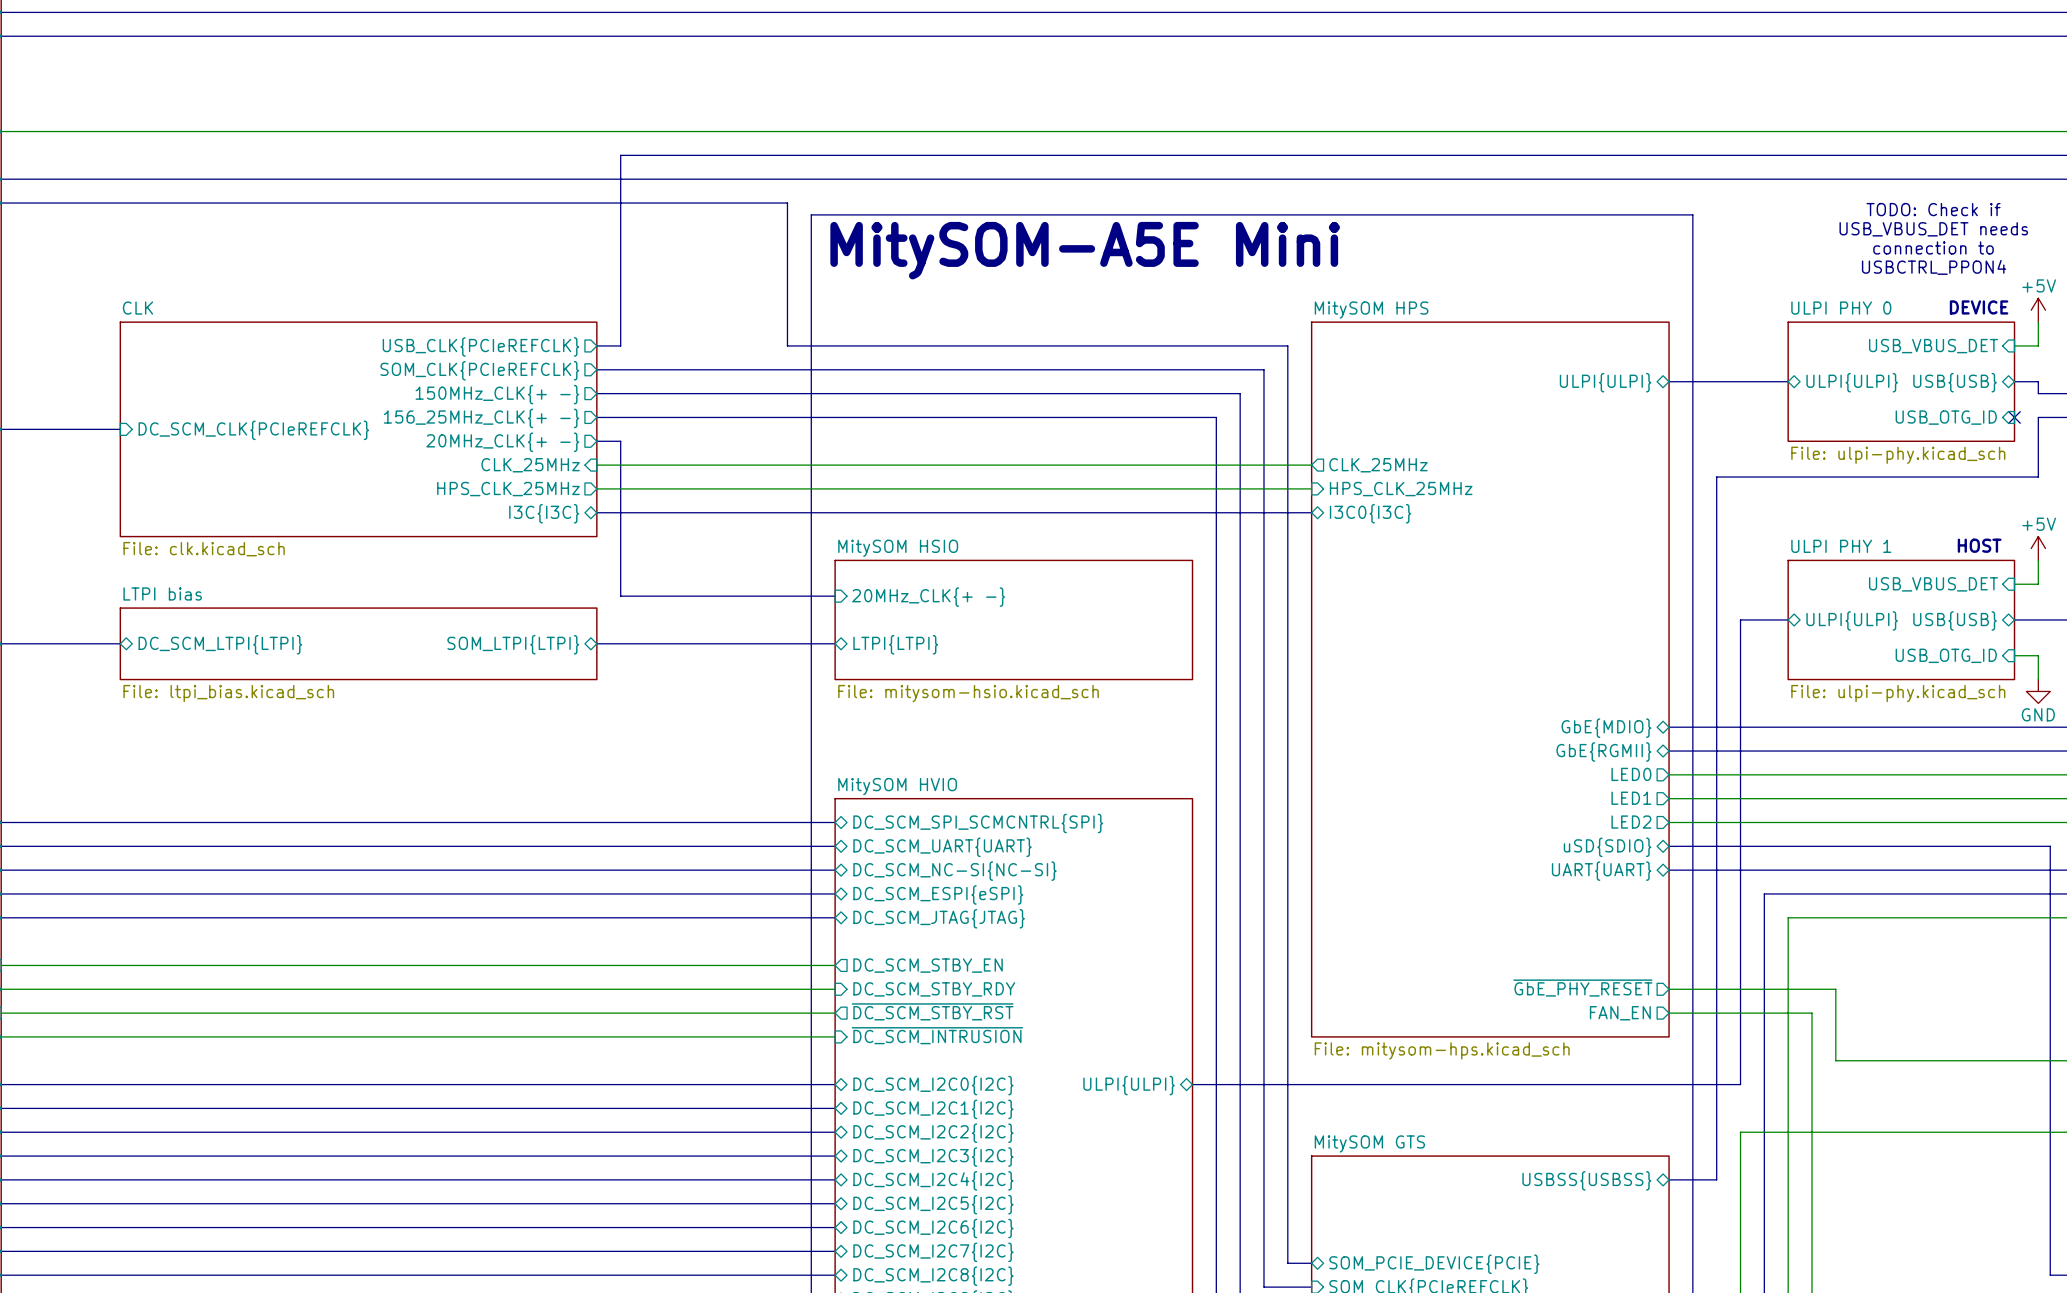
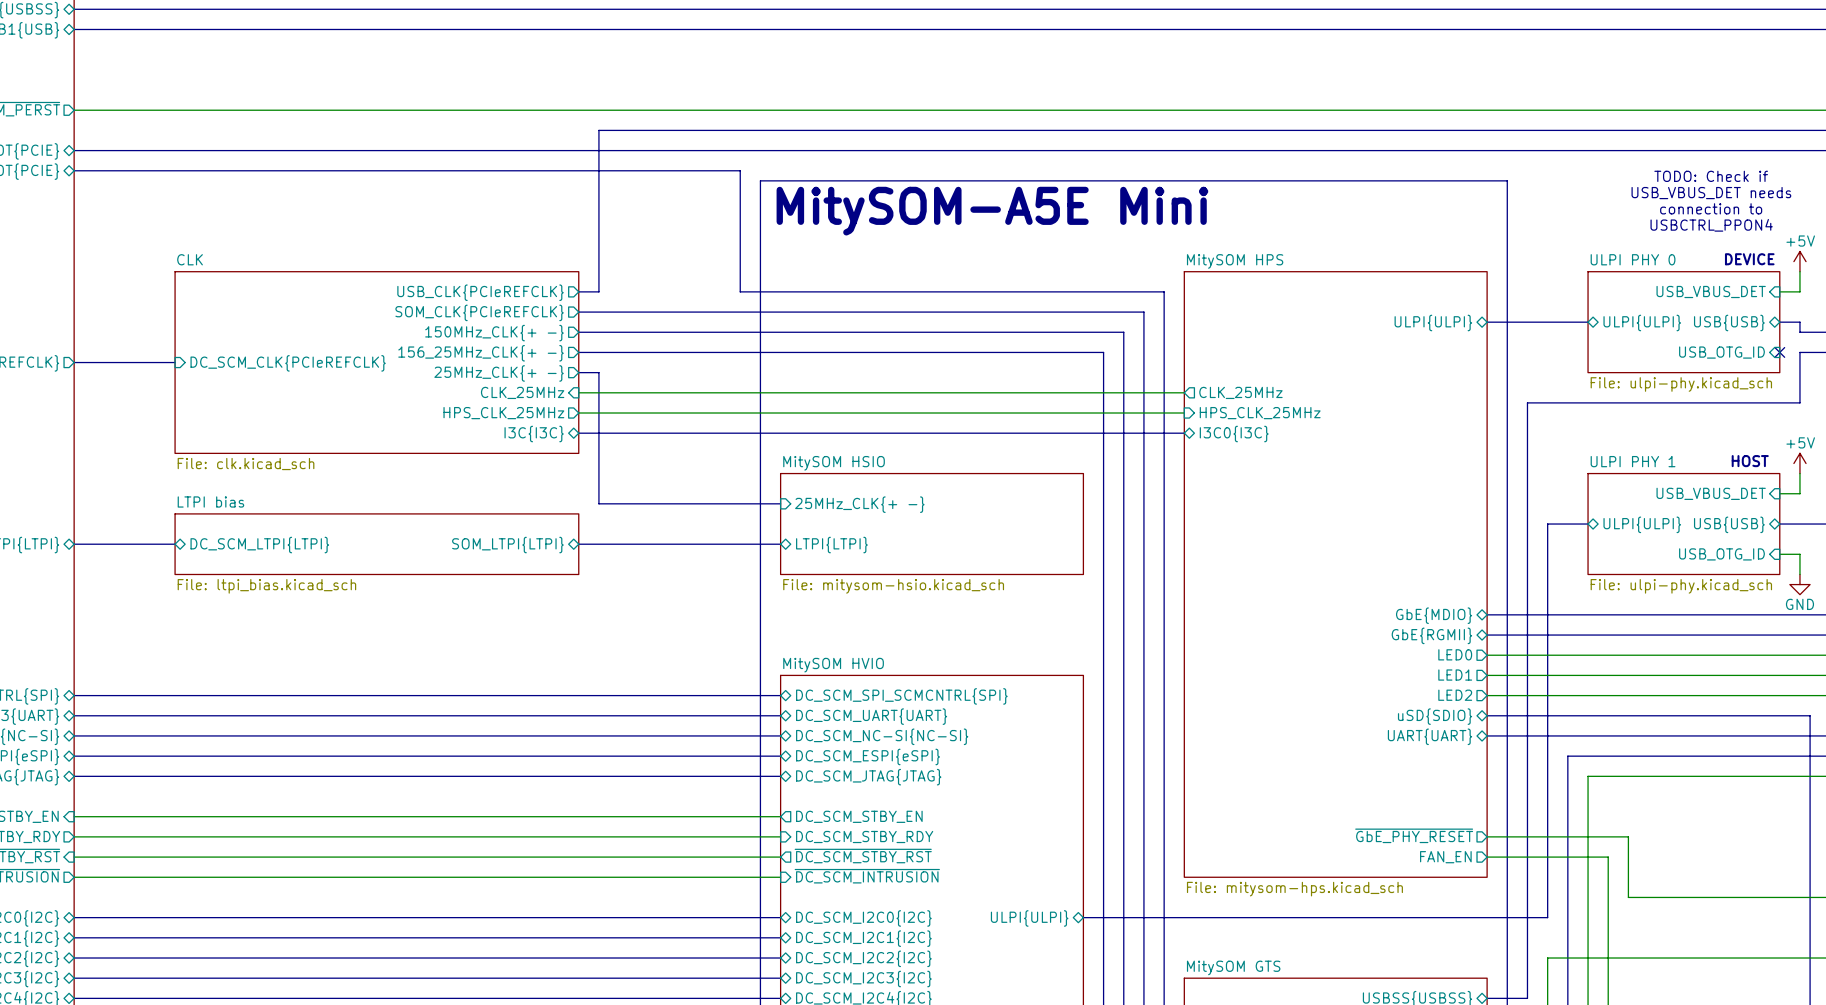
sheet pin: 20MHz_CLK{+ -} (502, 442) -> 25MHz_CLK{+ -} (499, 373)
sheet pin: 20MHz_CLK{+ -} (928, 597) -> 25MHz_CLK{+ -} (859, 504)

